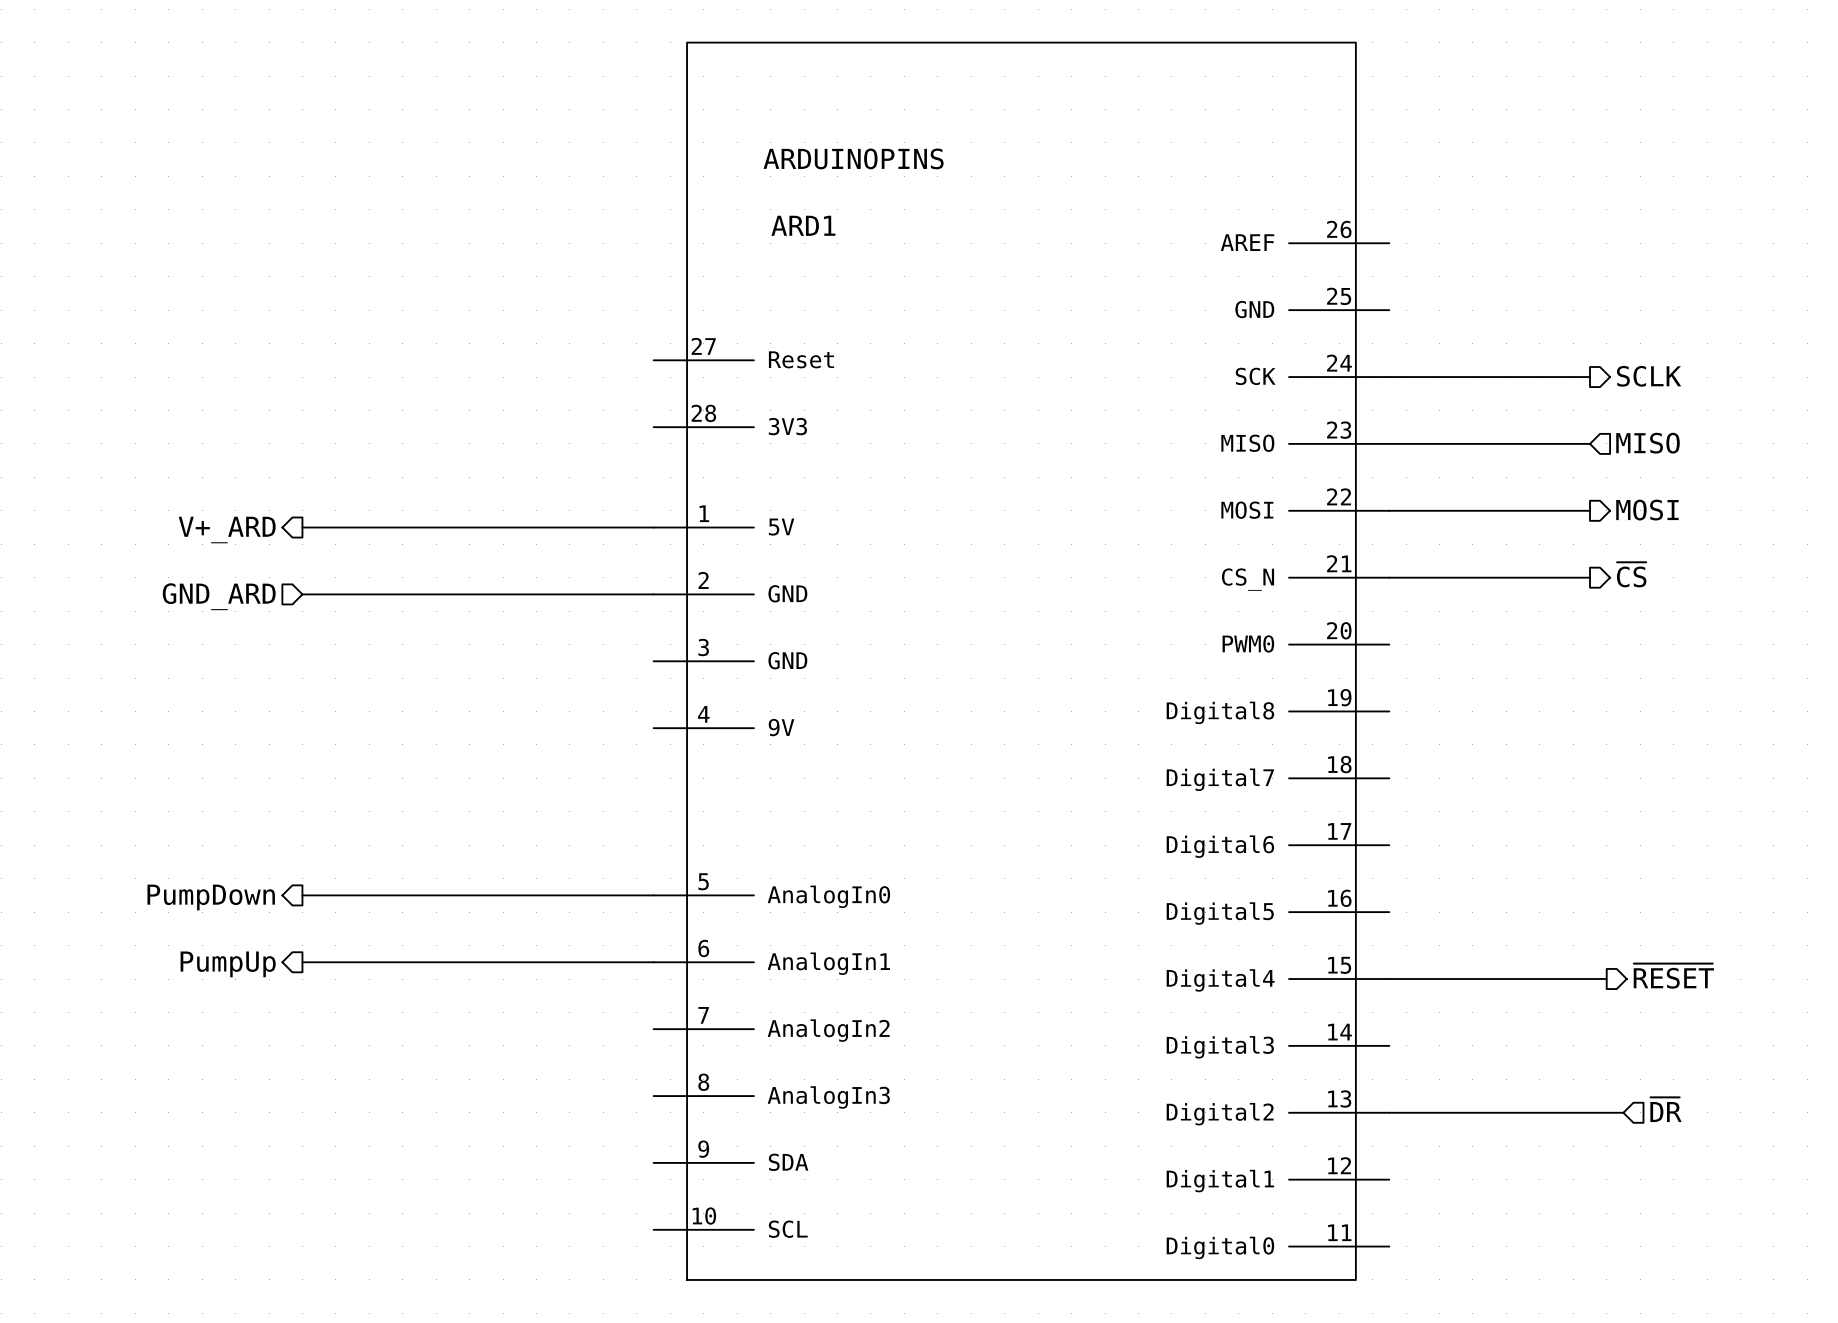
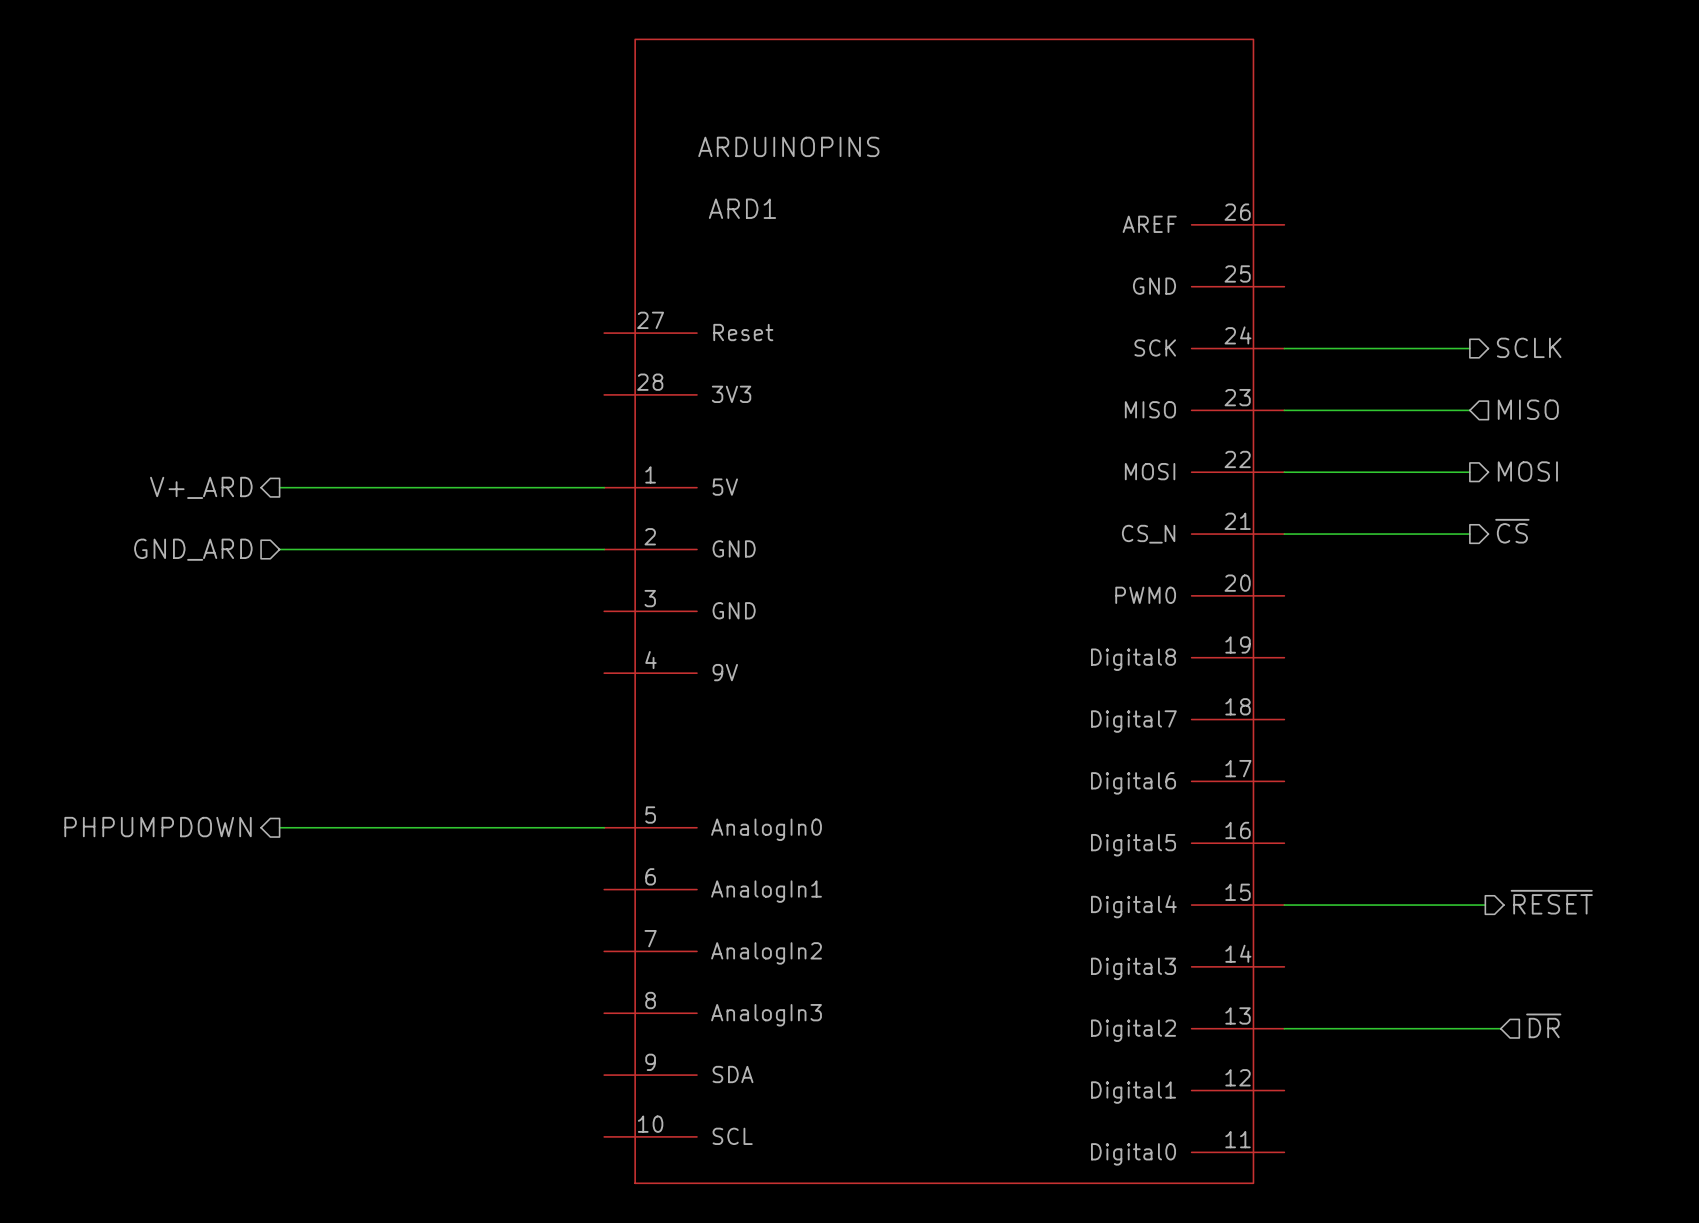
hierarchical label: PumpDown (211, 897) -> PHPUMPDOWN (158, 827)
wire: (302, 962) (653, 962) -> none
hierarchical label: PumpUp (228, 964) -> none

